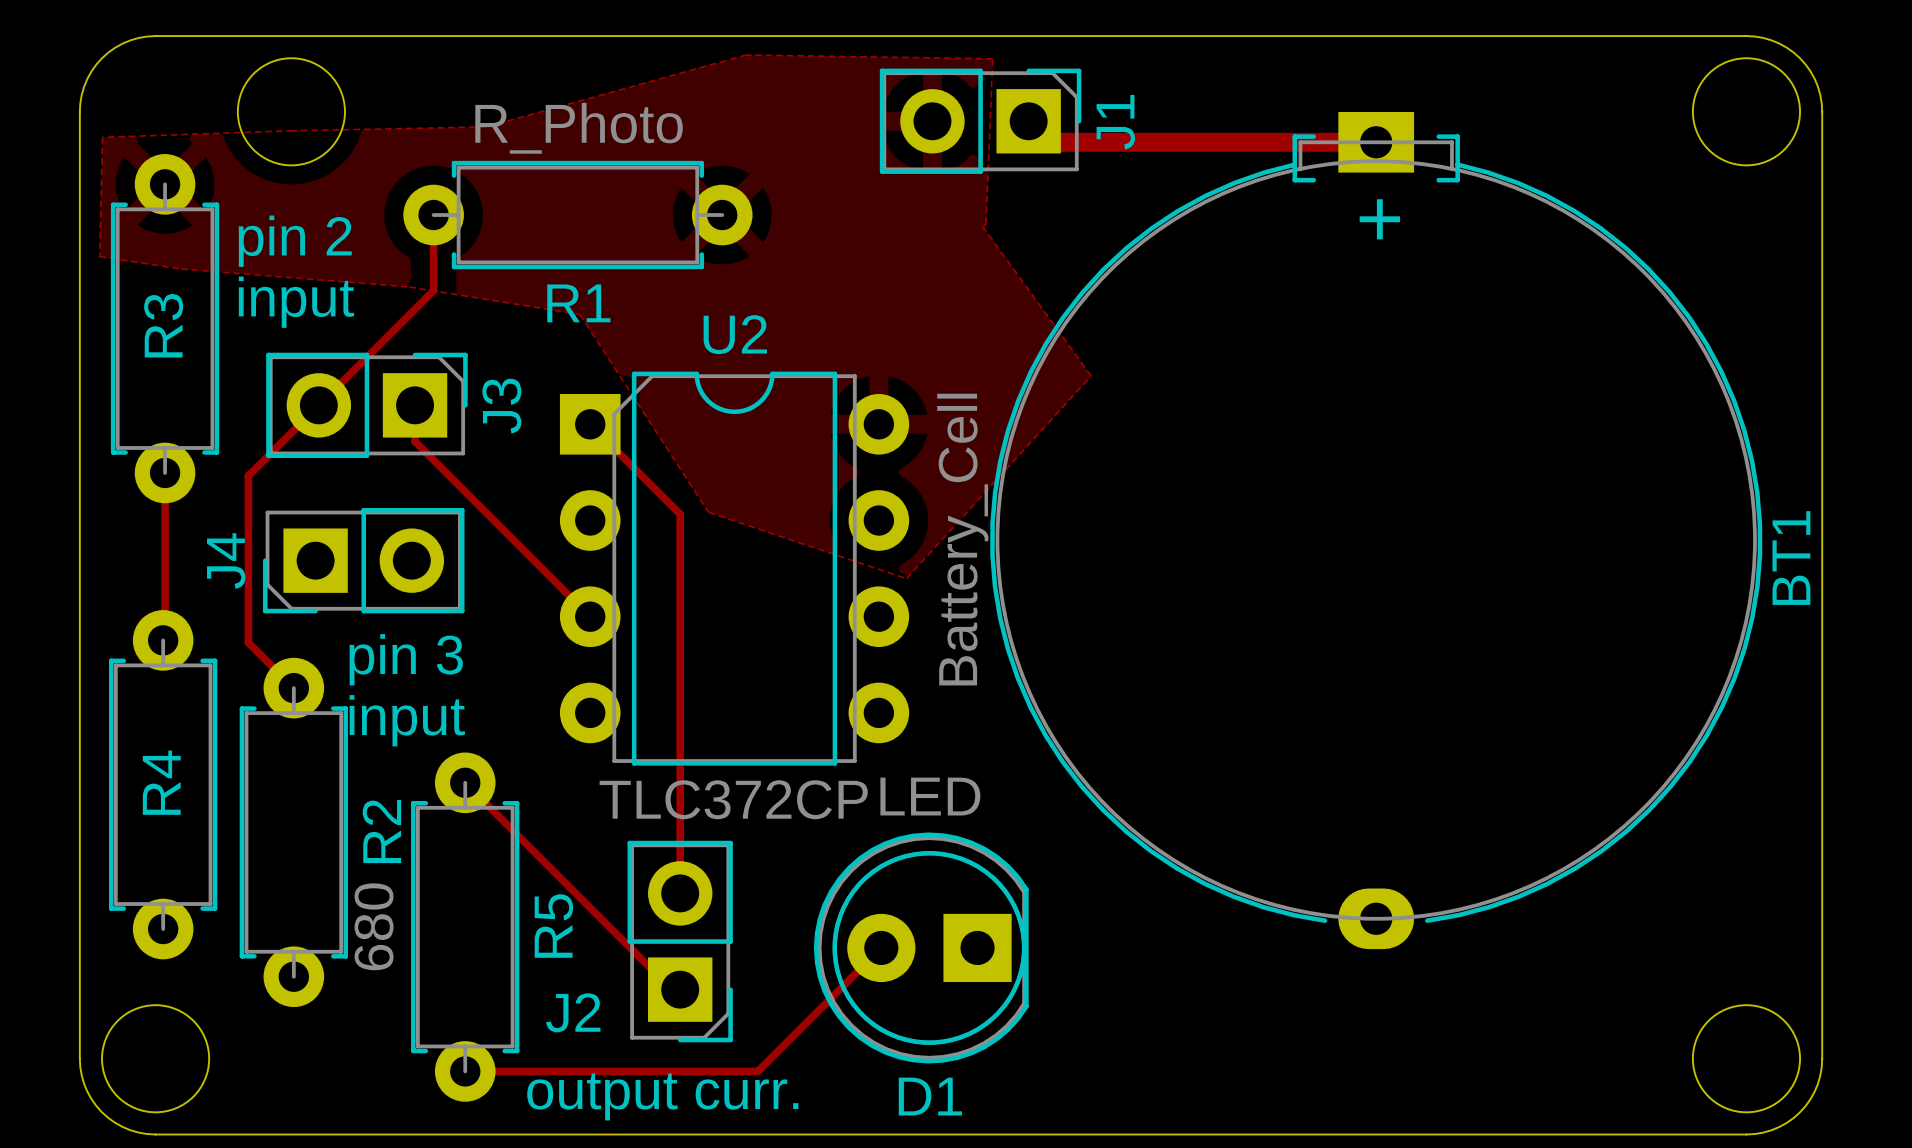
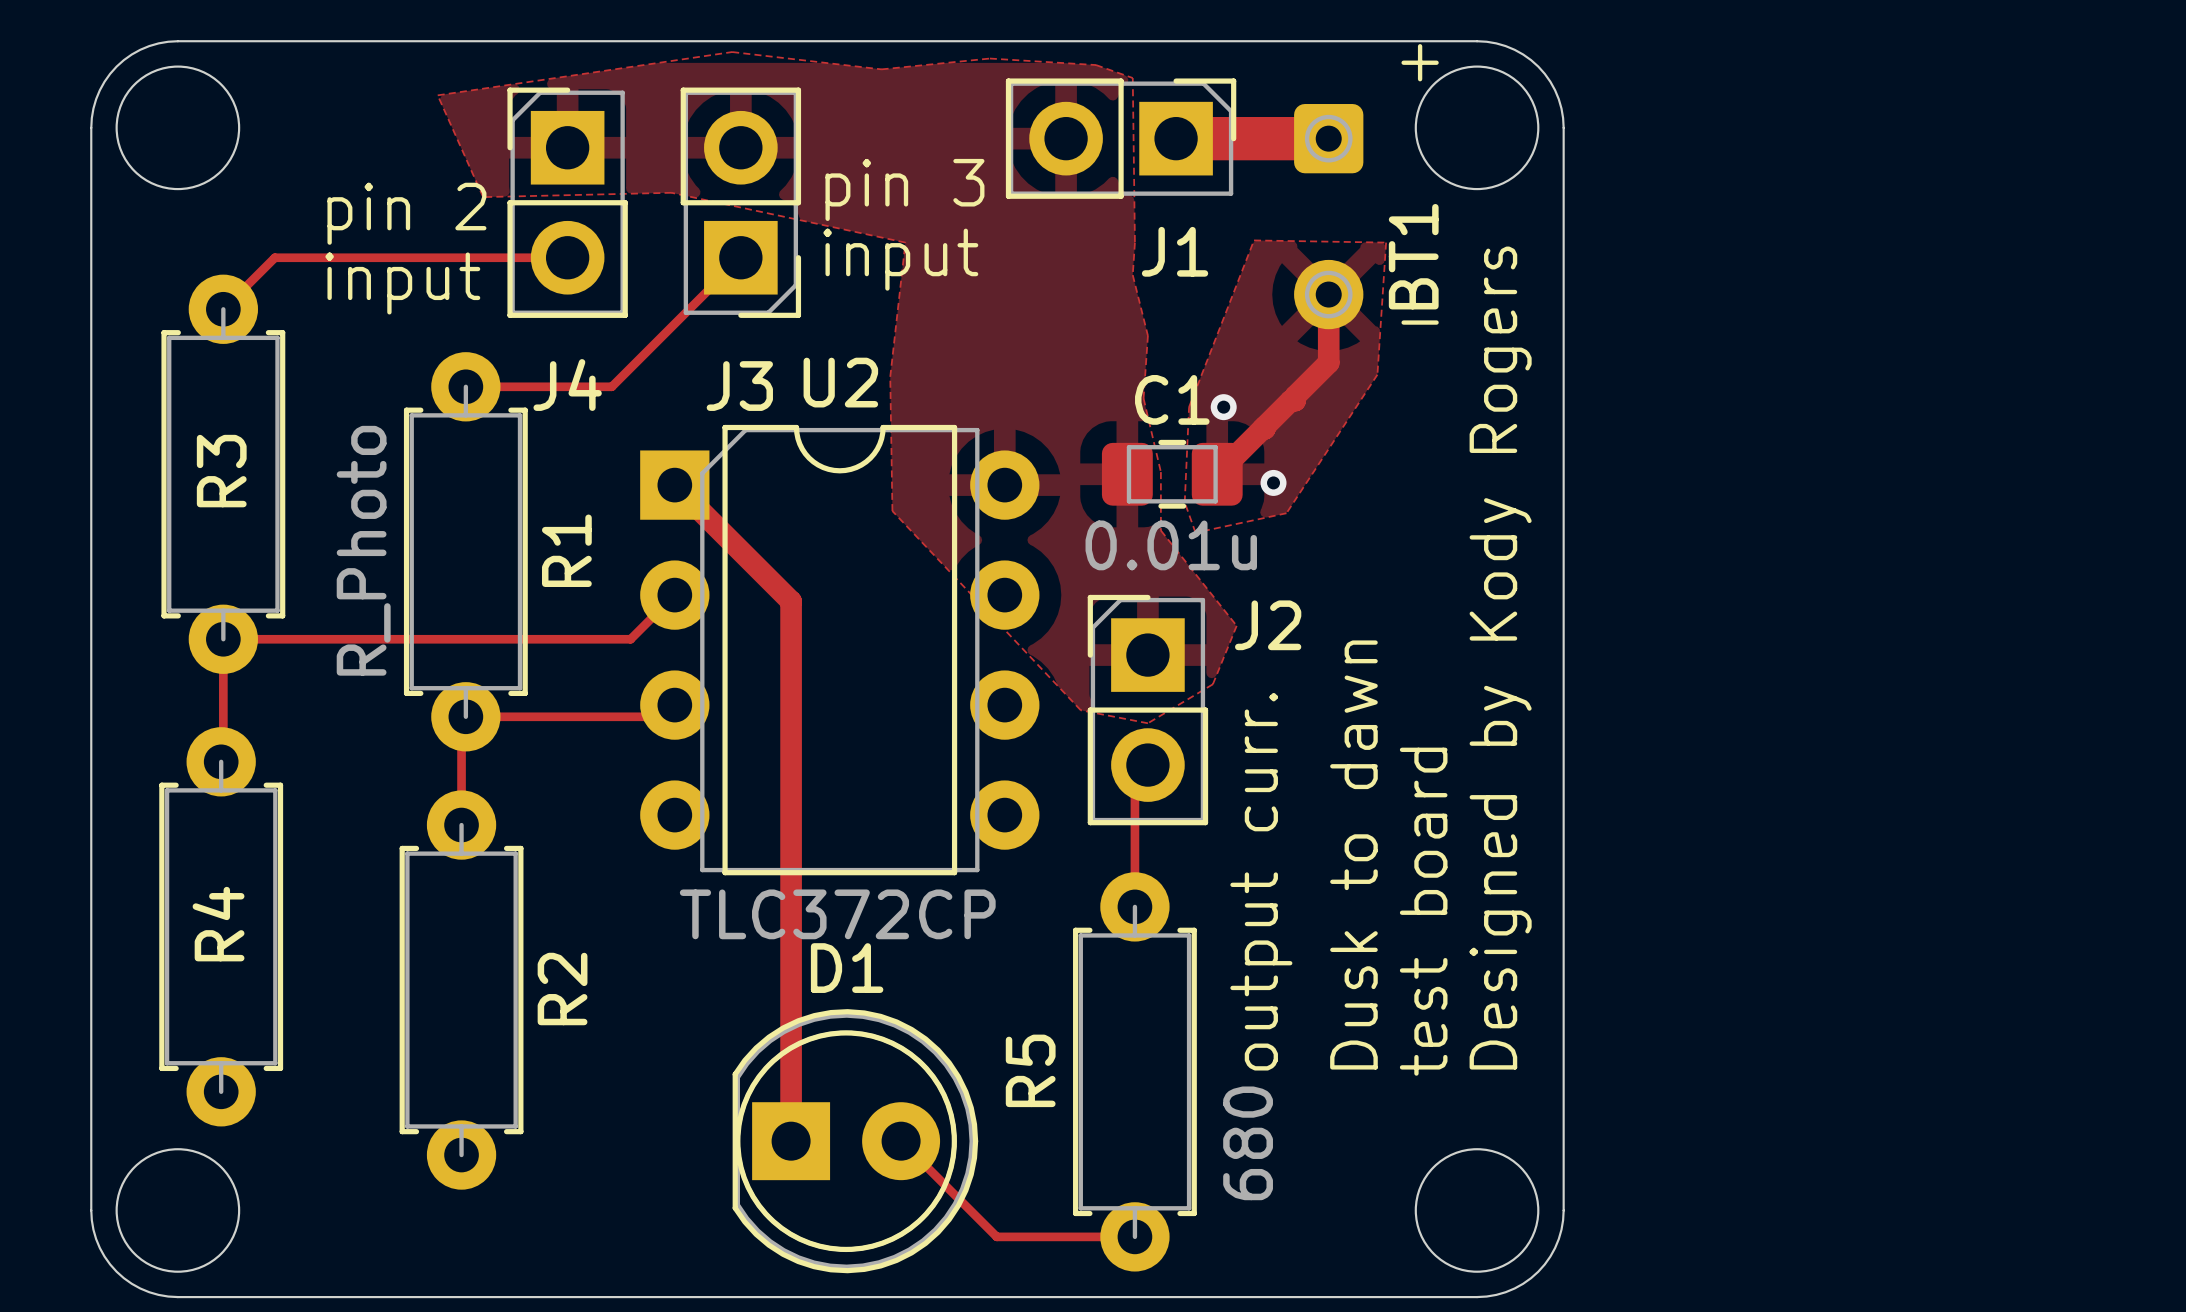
board edge: (1291, 36) (1754, 36) (1771, 40) (1786, 47) (1805, 64) (1817, 86) (1822, 111) (1822, 1058) (1820, 1075) (1814, 1091) (1805, 1105) (1793, 1117) (1779, 1127) (1754, 1134) (1291, 1134) -> (1477, 41) (1496, 43) (1514, 49) (1538, 66) (1550, 81) (1558, 99) (1563, 127) (1563, 1220) (1555, 1248) (1538, 1271) (1514, 1288) (1496, 1294) (1477, 1297)
text: none -> + (1420, 62)
zone outline: (746, 54) (992, 58) (986, 223) (983, 227) (1091, 376) (906, 578) (708, 512) (579, 314) (409, 286) (181, 269) (99, 256) (102, 137) (486, 126) (746, 54) -> (732, 52) (437, 95) (483, 197) (671, 192) (905, 242) (890, 376) (892, 511) (1080, 710) (1147, 723) (1212, 684) (1236, 625) (1160, 530) (1160, 472) (1143, 398) (1147, 335) (1132, 275) (1134, 242) (1132, 78) (1095, 65) (989, 58) (881, 69) (732, 52)
round board edge position: (291, 111) -> (177, 127)
BT1 footprint: [990, 111, 1763, 950] -> [1294, 104, 1364, 330]
round board edge position: (1746, 111) -> (1477, 127)
track: (1028, 121) (1049, 142) (1376, 142) -> (1176, 138) (1328, 138)
J1 name rotation: 0° (1115, 122) -> 90° clockwise (1175, 251)
J1 name position: J1 (1115, 122) -> J1 (1175, 251)
R1 value position: R_Photo (579, 128) -> R_Photo (363, 550)
zone outline: none -> (1254, 240) (1386, 242) (1377, 374) (1286, 513) (1195, 532) (1184, 502) (1189, 407) (1254, 240)
track: (433, 215) (433, 290) (248, 475) (248, 642) (293, 688) -> none
R1 rotation: 0° (577, 215) -> 90° clockwise (465, 551)
R1 position: (577, 215) -> (465, 551)
track: none -> (567, 257) (274, 257) (223, 309)
track: none -> (740, 257) (611, 386) (465, 386)
text: none -> input (900, 259)
text position: pin 2 (295, 241) -> pin 2 (406, 213)
track: none -> (1328, 294) (1328, 362) (1295, 396) (1295, 400) (1290, 400) (1264, 428) (1217, 474)
text: none -> - (1420, 322)
text position: input (296, 302) -> input (402, 283)
R1 name position: R1 (578, 303) -> R1 (566, 550)
R3 position: (165, 328) -> (223, 474)
via: none -> (1223, 407)
J3 rotation: 0° (366, 405) -> 90° clockwise (740, 202)
J3 position: (366, 405) -> (740, 202)
track: (415, 405) (415, 441) (590, 616) -> (461, 825) (461, 727) (465, 723) (465, 716) (663, 716) (674, 705)
C1: none -> 0.01u (1172, 474)
via: none -> (1273, 482)
track width: thin (590, 424) (680, 514) -> thick (674, 485) (777, 587)
track: (165, 472) (165, 638) (163, 640) -> none
track: (680, 514) (680, 893) -> (777, 587) (791, 601) (791, 1141)
track: none -> (674, 595) (630, 639) (223, 639) (223, 759) (221, 761)
BT1 value: Battery_Cell (962, 539) -> none
BT1 name position: BT1 (1791, 558) -> BT1 (1413, 256)
J4 rotation: 0° (363, 560) -> 90° clockwise (567, 202)
J4 position: (363, 560) -> (567, 202)
J4 name position: J4 (226, 561) -> J4 (567, 385)
text: none -> Designed by Kody Rogers (1500, 658)
text position: pin 3 (406, 659) -> pin 3 (904, 189)
track: none -> (1147, 765) (1134, 778) (1134, 906)
text: input (407, 720) -> none
text: none -> Dusk to dawn (1353, 854)
track: (465, 782) (672, 989) (680, 989) -> none
R4 position: (163, 784) -> (221, 926)
D1 value: LED (930, 796) -> none
text: none -> test board (1423, 911)
R2 position: (293, 832) -> (461, 990)
R5 value position: 680 (374, 926) -> 680 (1248, 1143)
R5 name position: R5 (553, 926) -> R5 (1030, 1070)
R5 position: (465, 927) -> (1134, 1071)
J2 rotation: 0° (680, 941) -> 180° (1147, 710)
J2 position: (680, 941) -> (1147, 710)
track: (881, 947) (757, 1071) (465, 1071) -> none
D1 rotation: 0° (921, 947) -> 180° (855, 1141)
D1 position: (921, 947) -> (855, 1141)
track: none -> (901, 1141) (996, 1236) (1134, 1236)
round board edge position: (1746, 1058) -> (1477, 1210)
text rotation: 0° (662, 1096) -> 90° counterclockwise (1261, 881)
text position: output curr. (662, 1096) -> output curr. (1261, 881)

